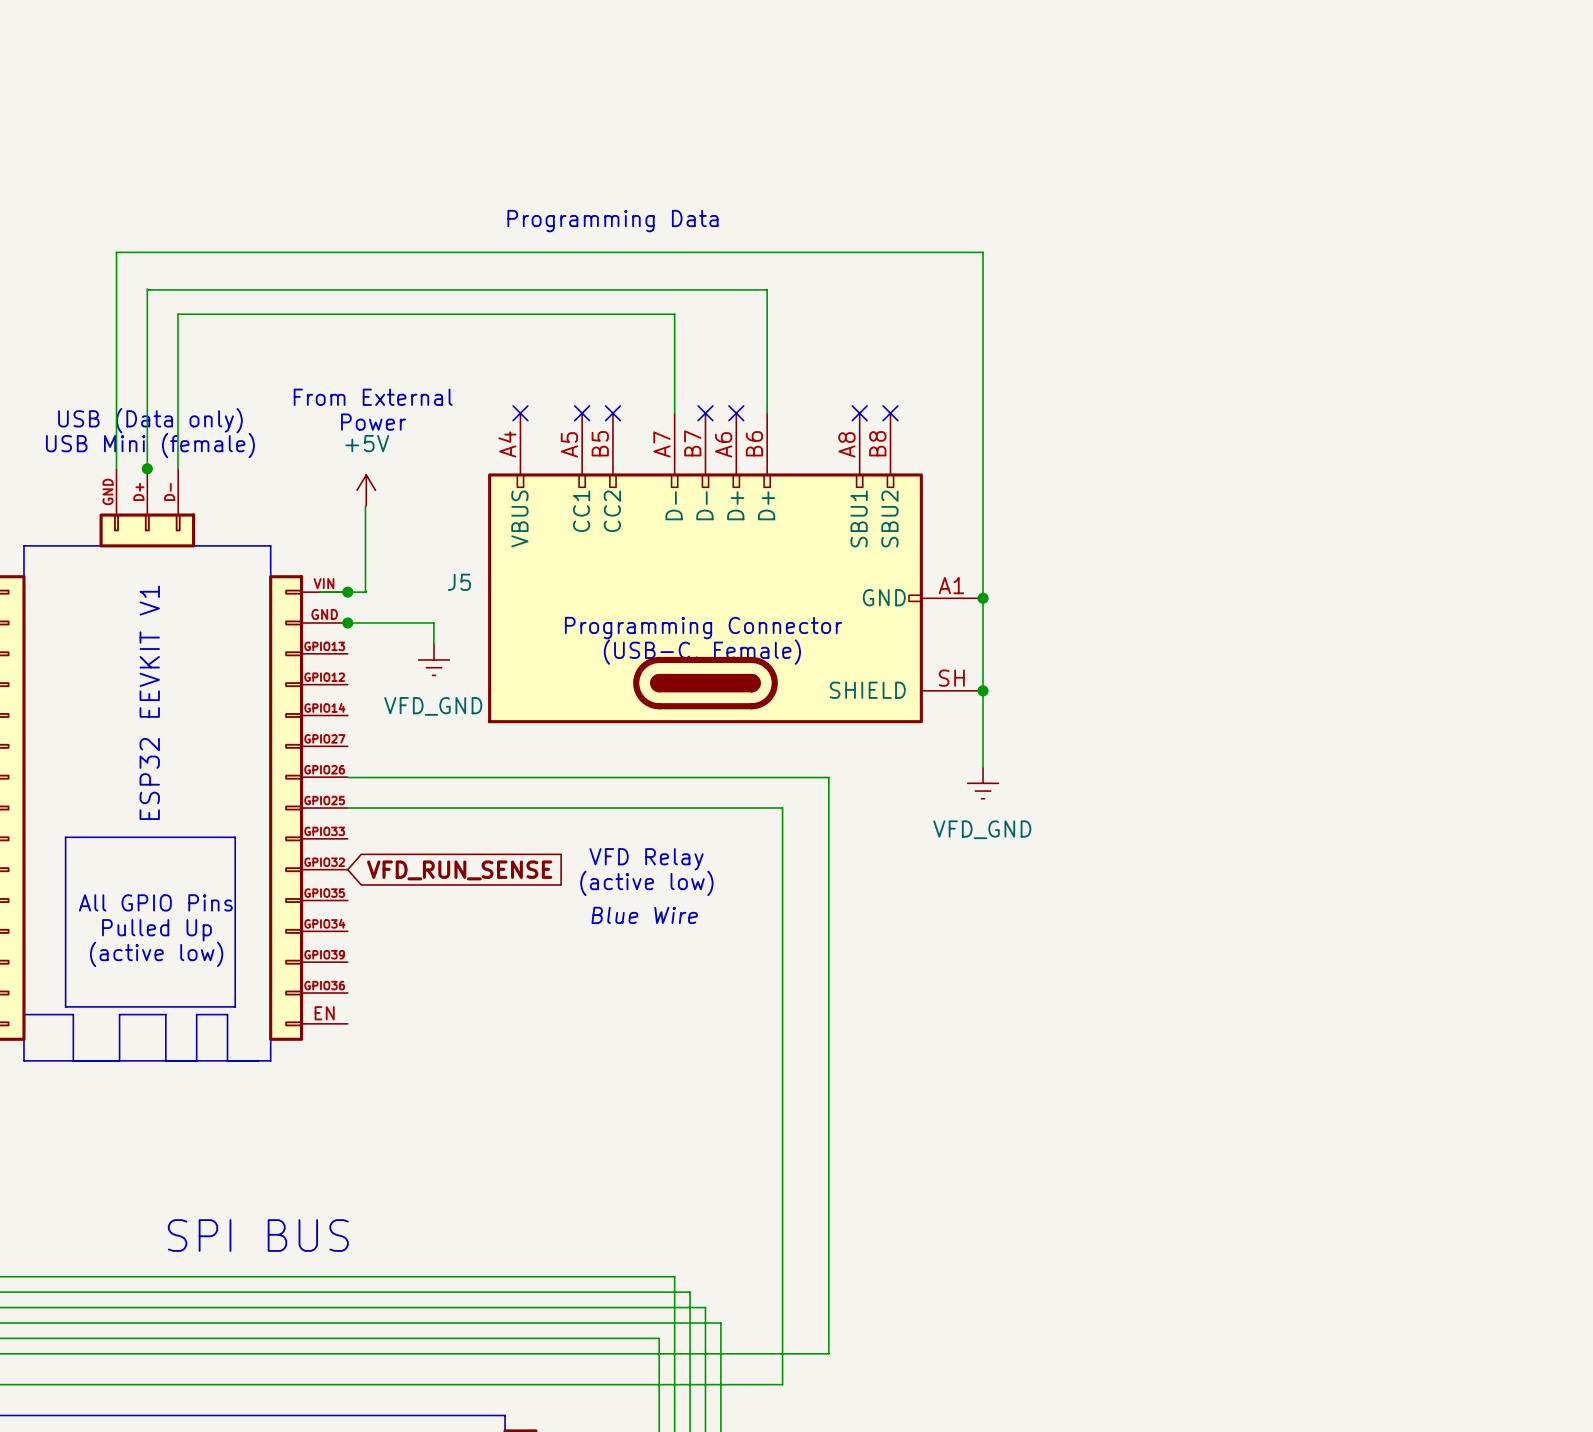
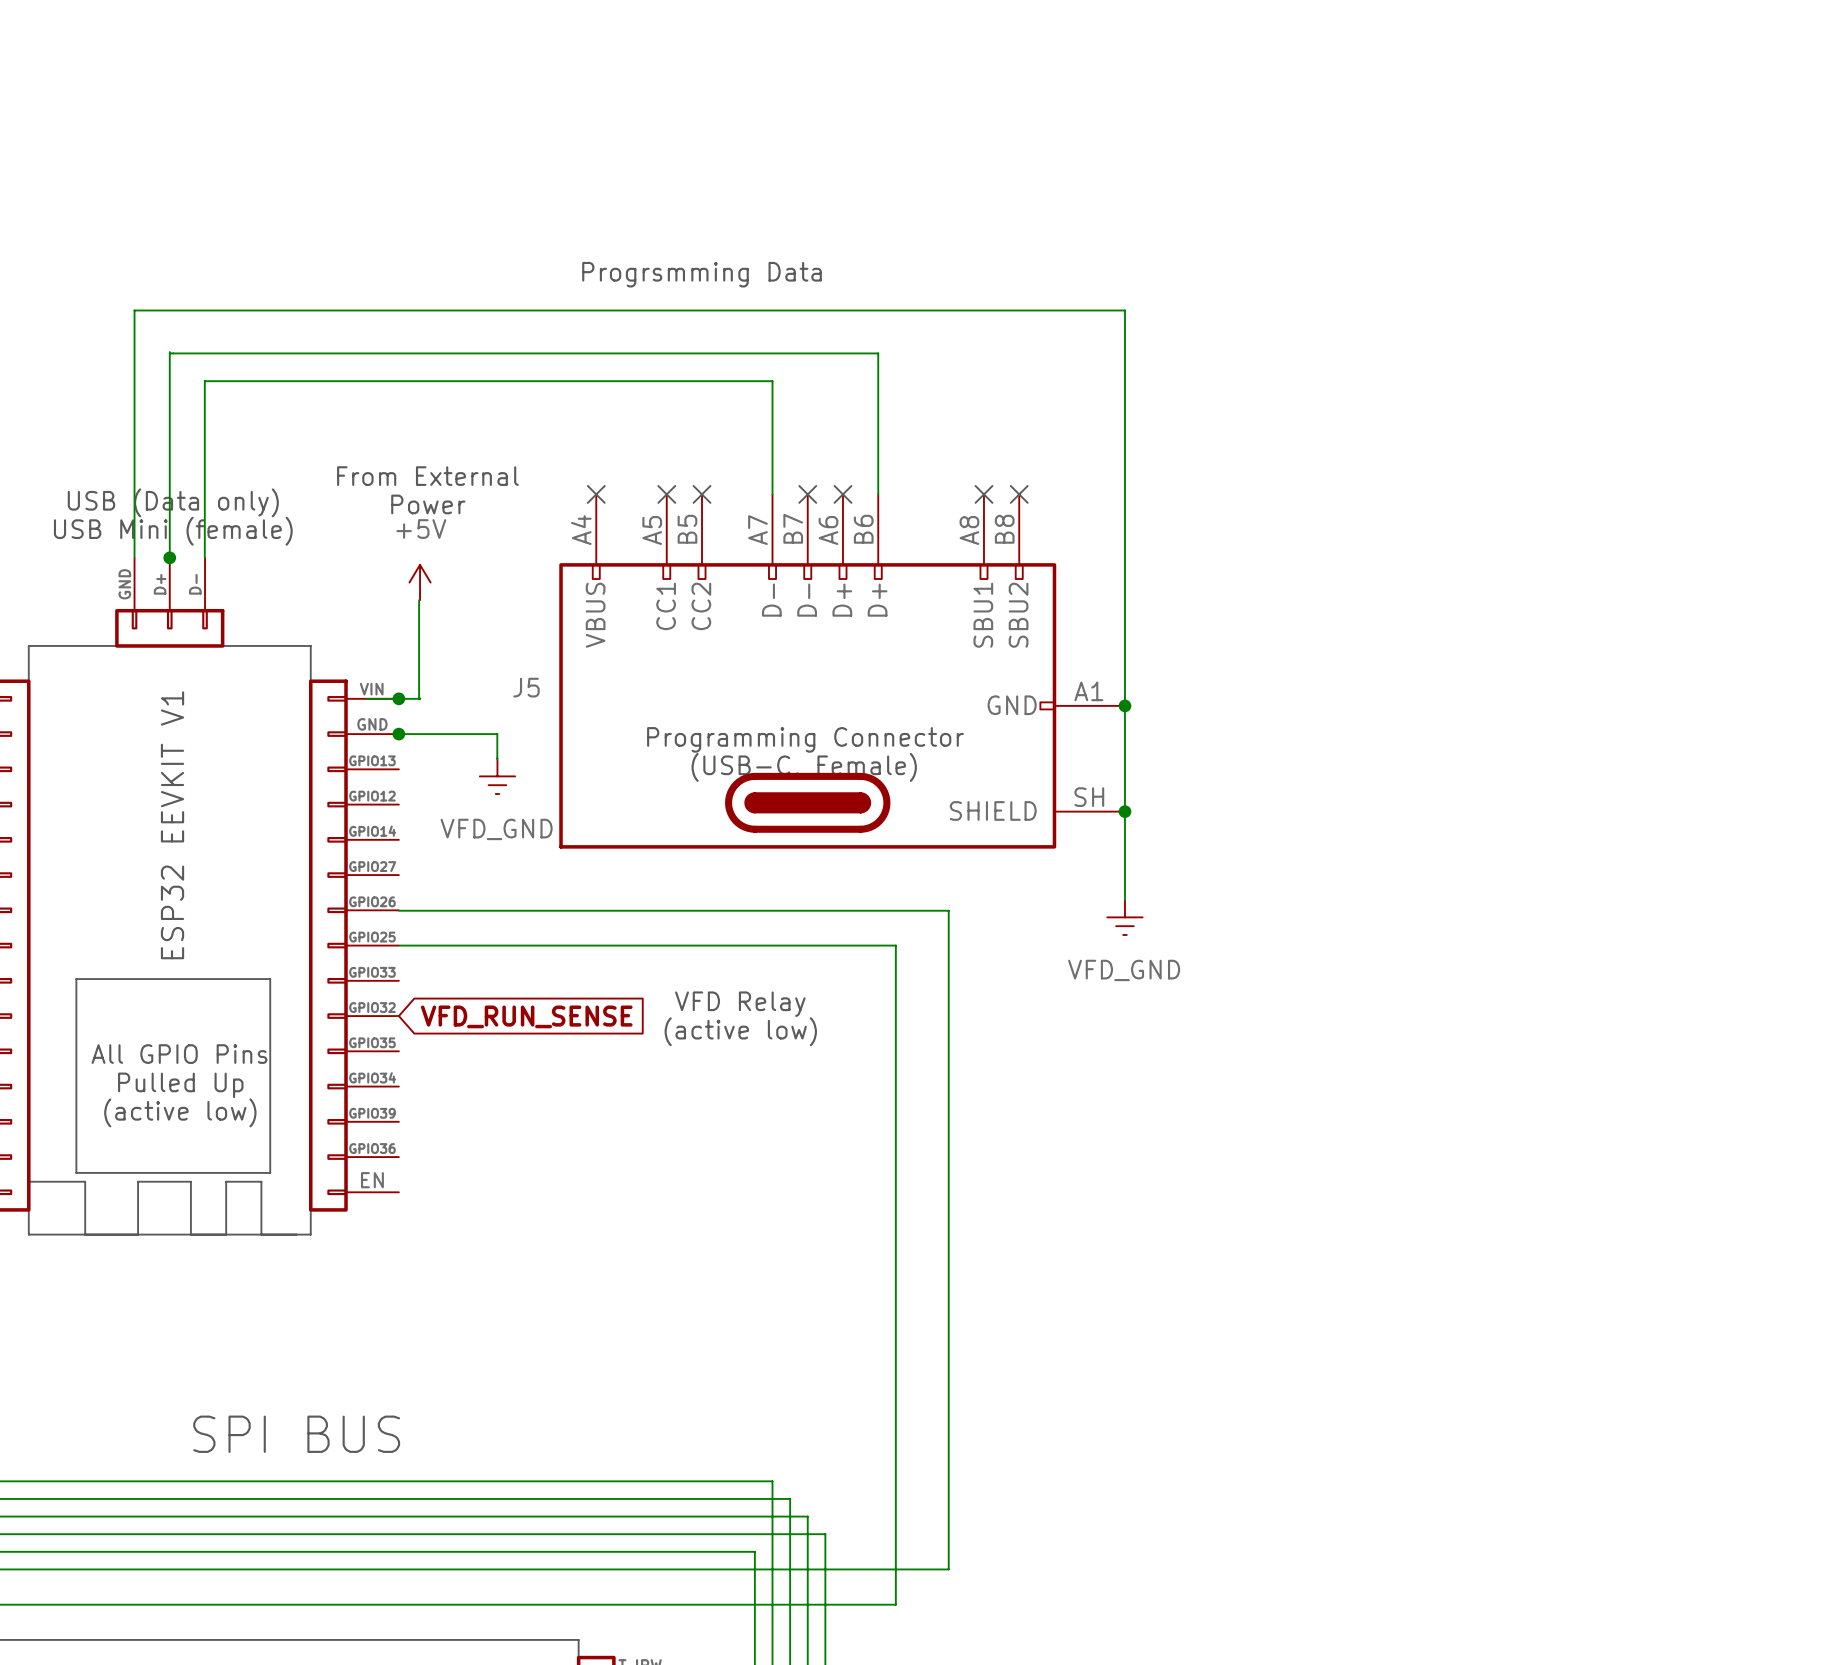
text: Programming Data (612, 221) -> Progrsmming Data (702, 274)
text: Blue Wire (644, 915) -> none

